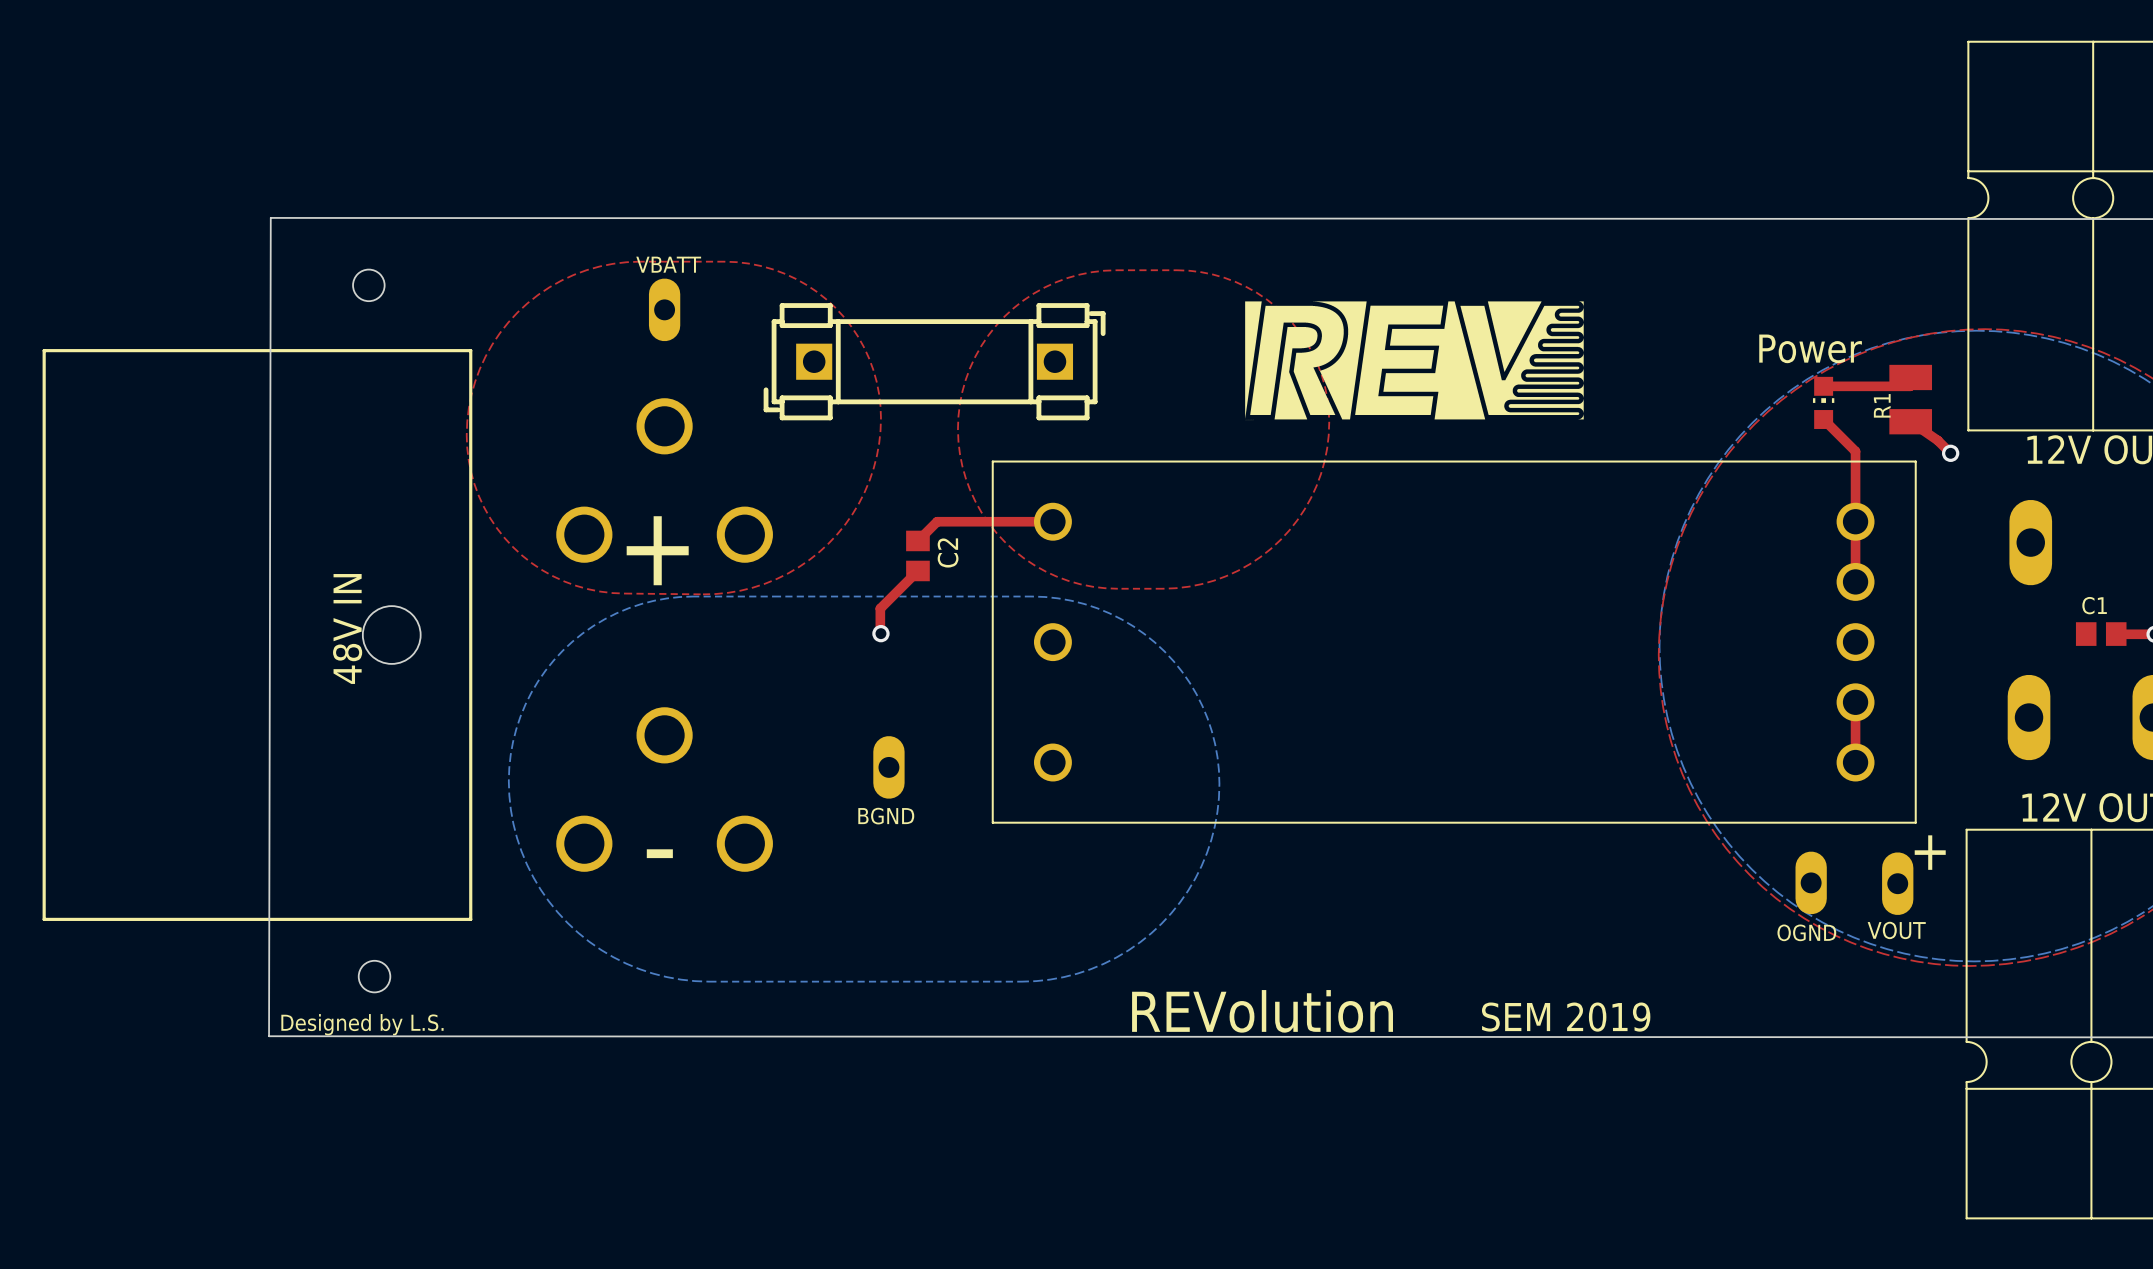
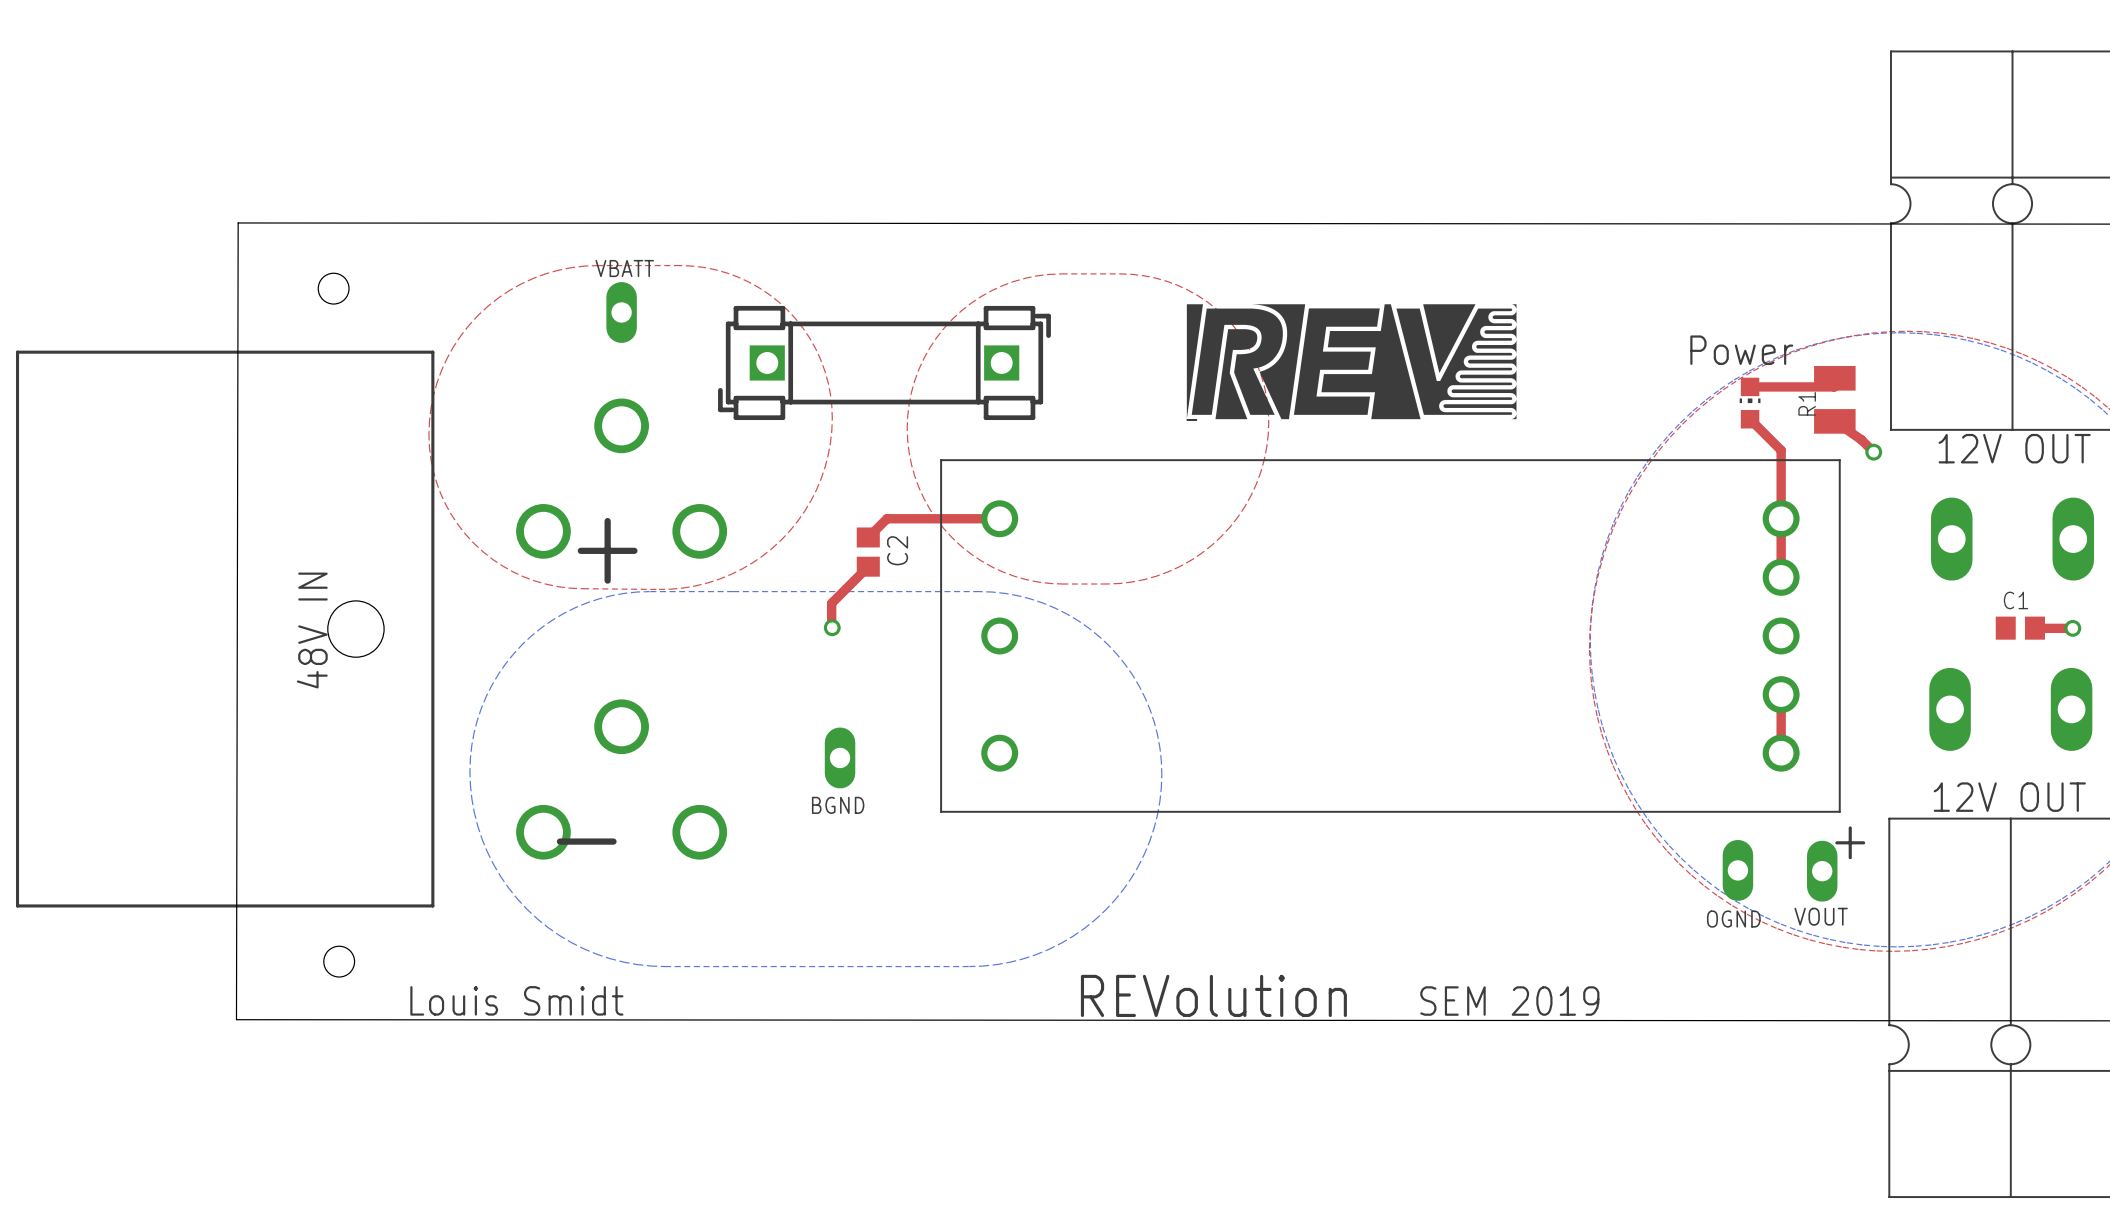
text: none -> Louis Smidt (516, 1000)
text: Designed by L.S. (362, 1024) -> none

